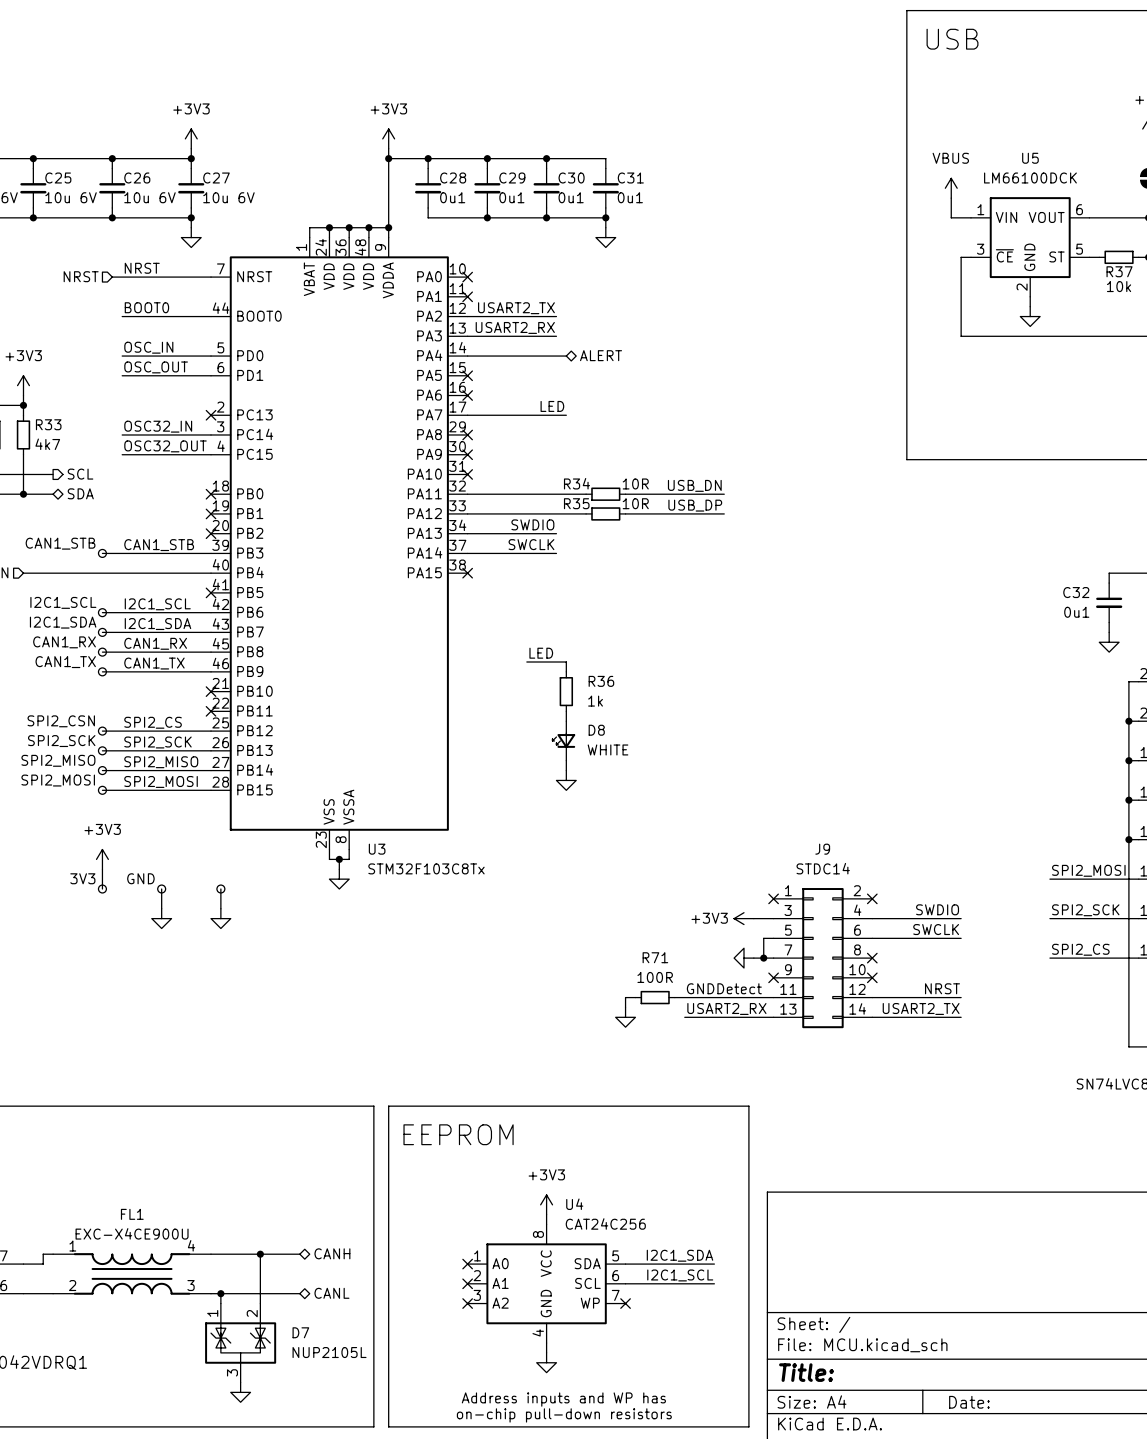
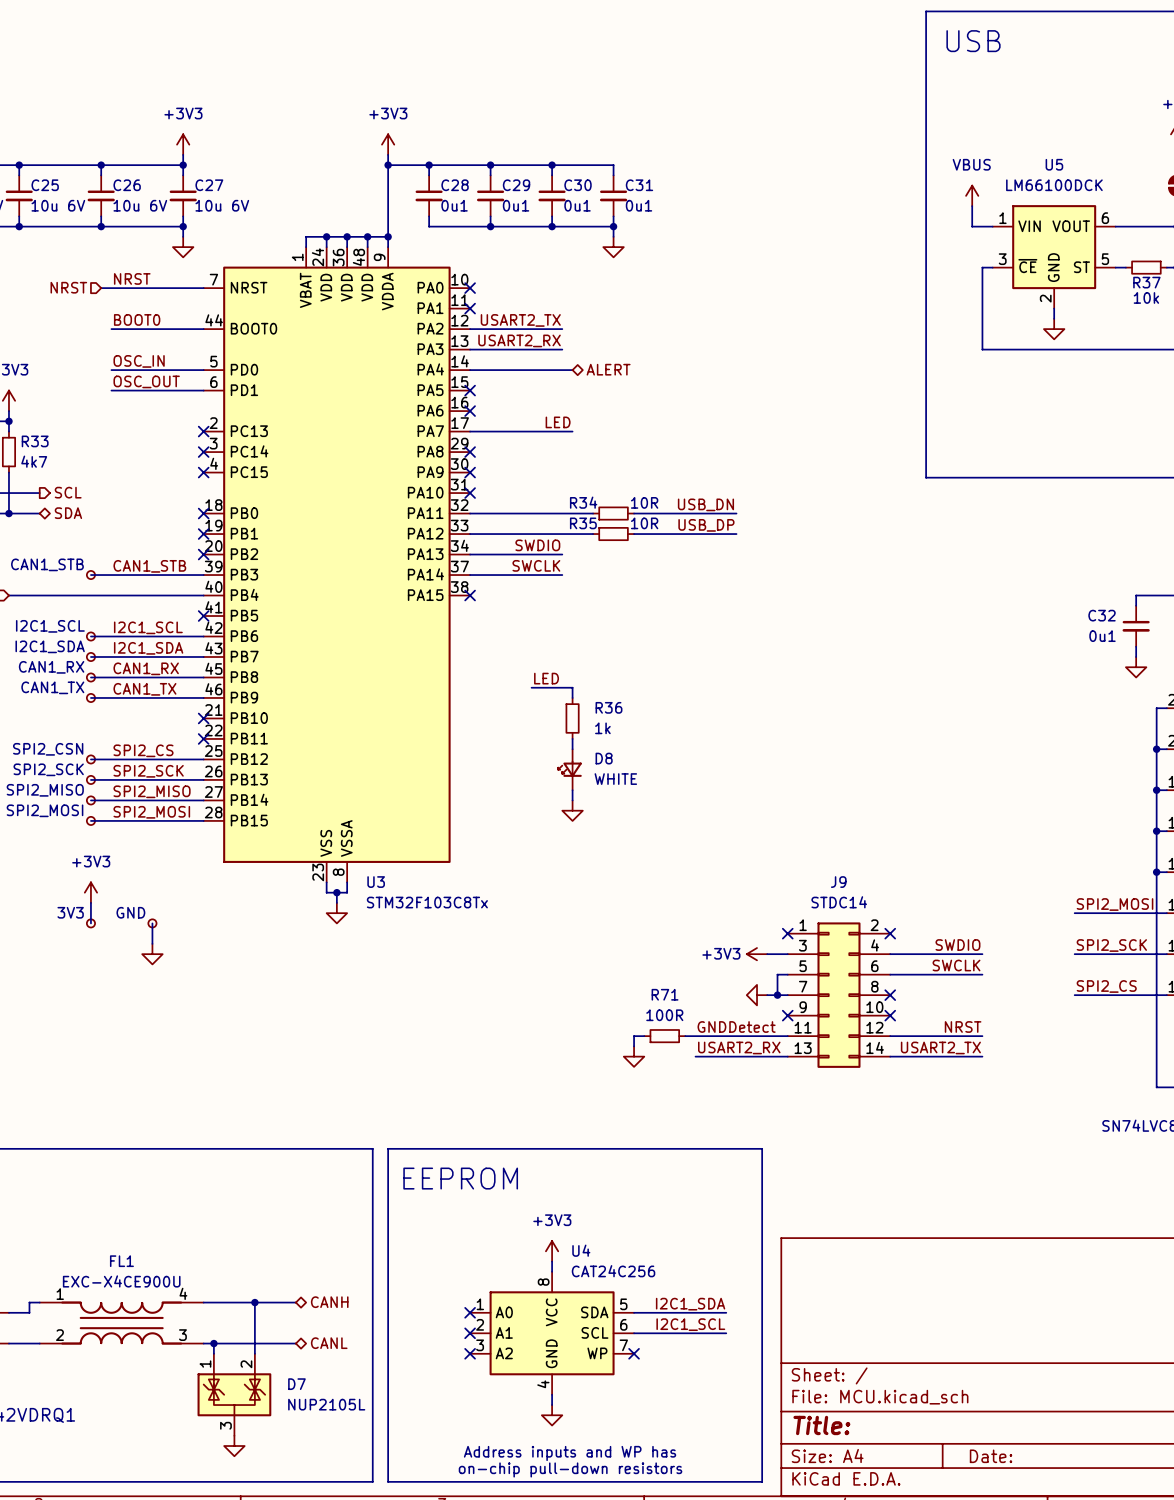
label: OSC32_IN (158, 426) -> none
wire: (122, 434) (211, 434) -> none
no-connect mark: none -> (203, 452)
label: OSC32_OUT (165, 446) -> none
wire: (122, 454) (211, 454) -> none
no-connect mark: none -> (203, 472)
wire: (220, 889) (220, 908) -> none
part: (220, 889) -> none
power symbol: (220, 918) -> none

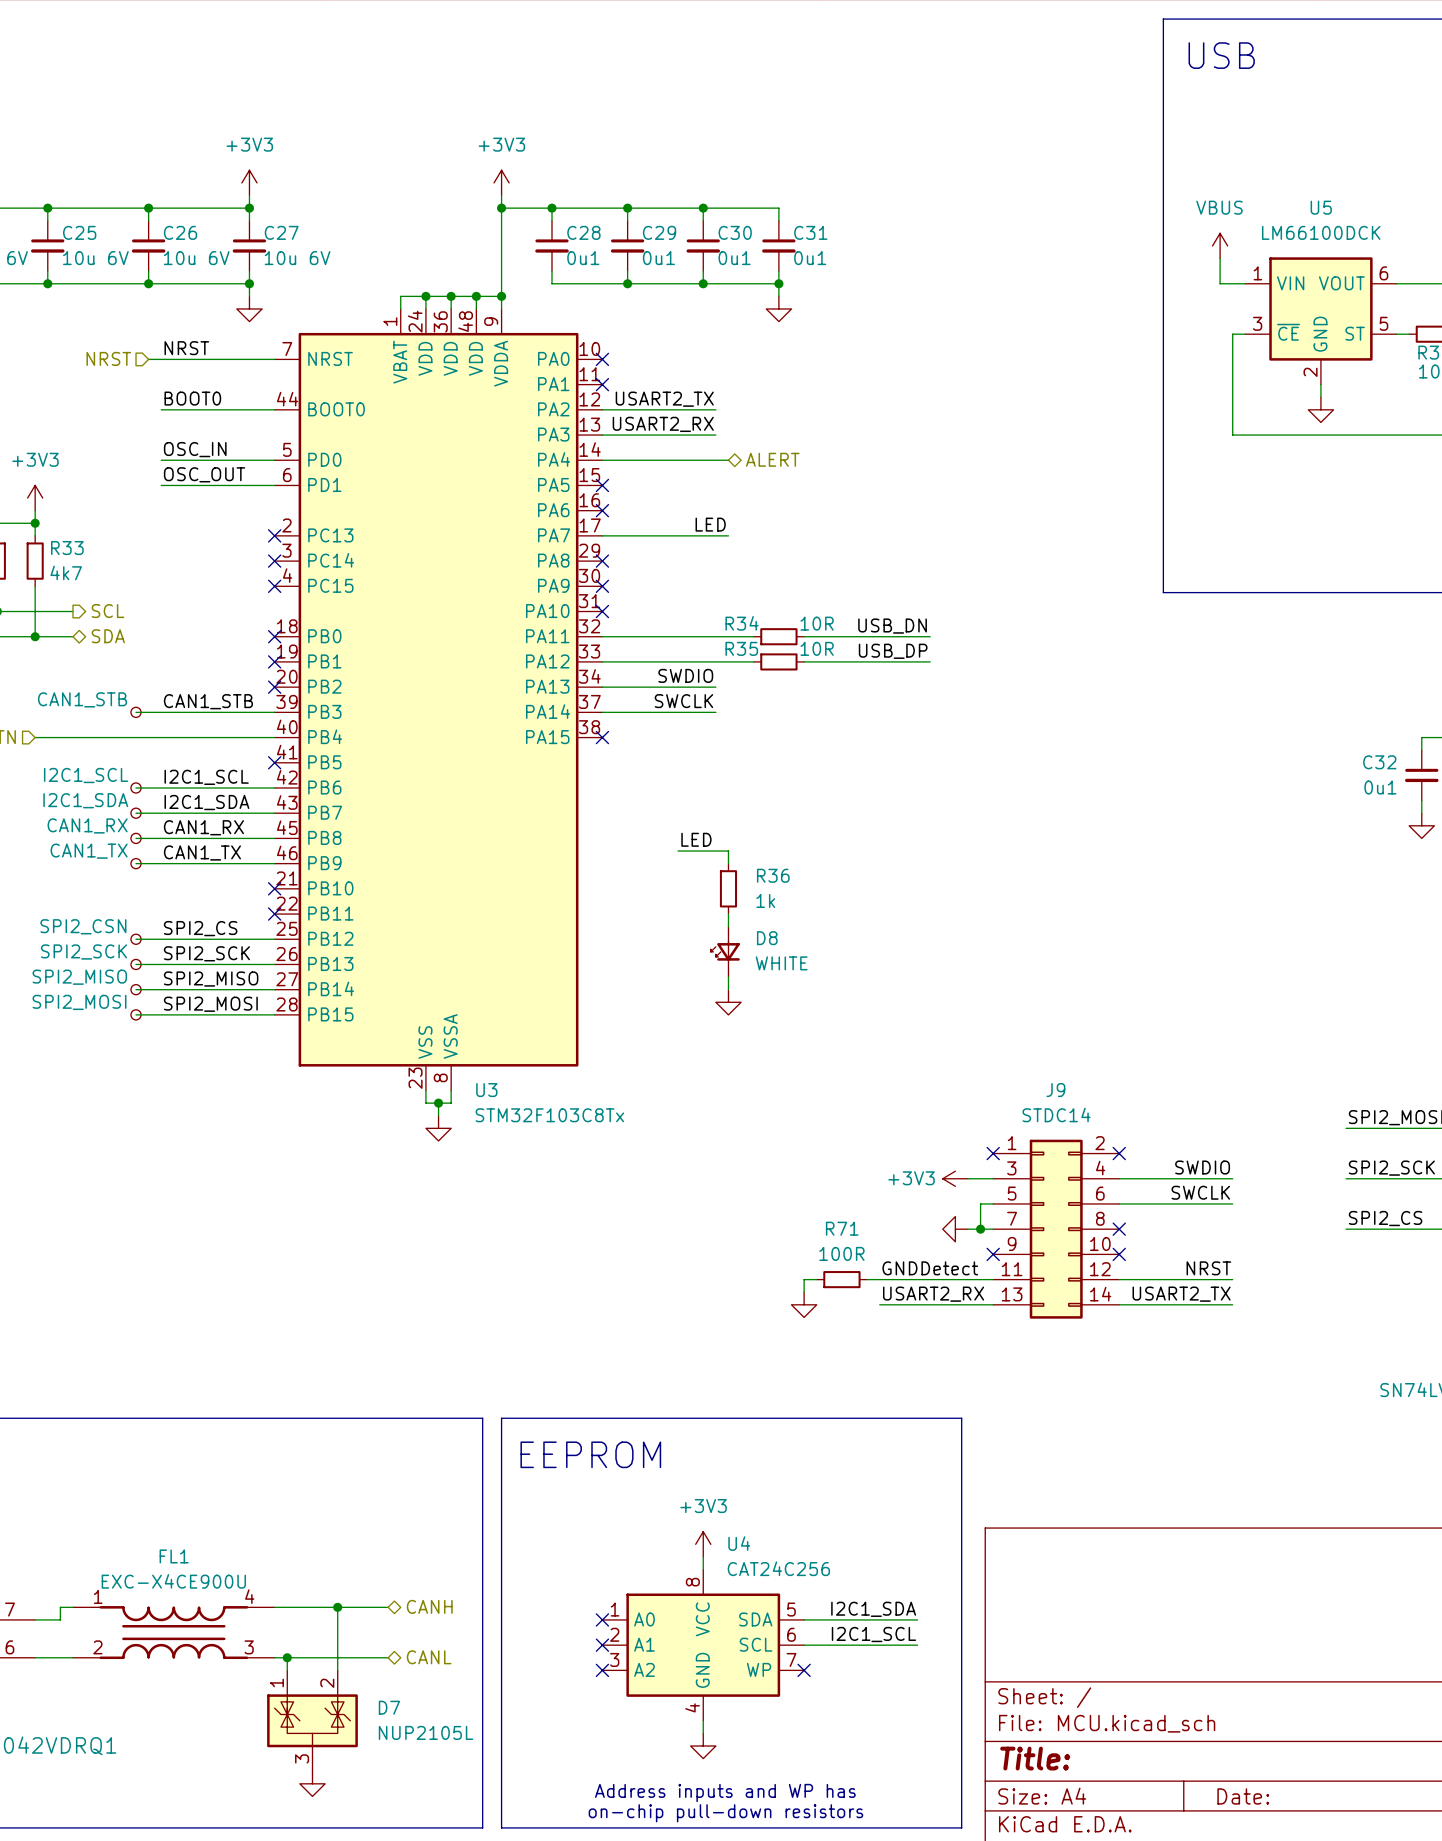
power symbol: +3V3 (90, 892) -> none
wire: (90, 902) (90, 923) -> none
part: 3V3 (90, 923) -> none
wire: (152, 923) (152, 943) -> none
part: GND (152, 923) -> none
power symbol: (152, 954) -> none

